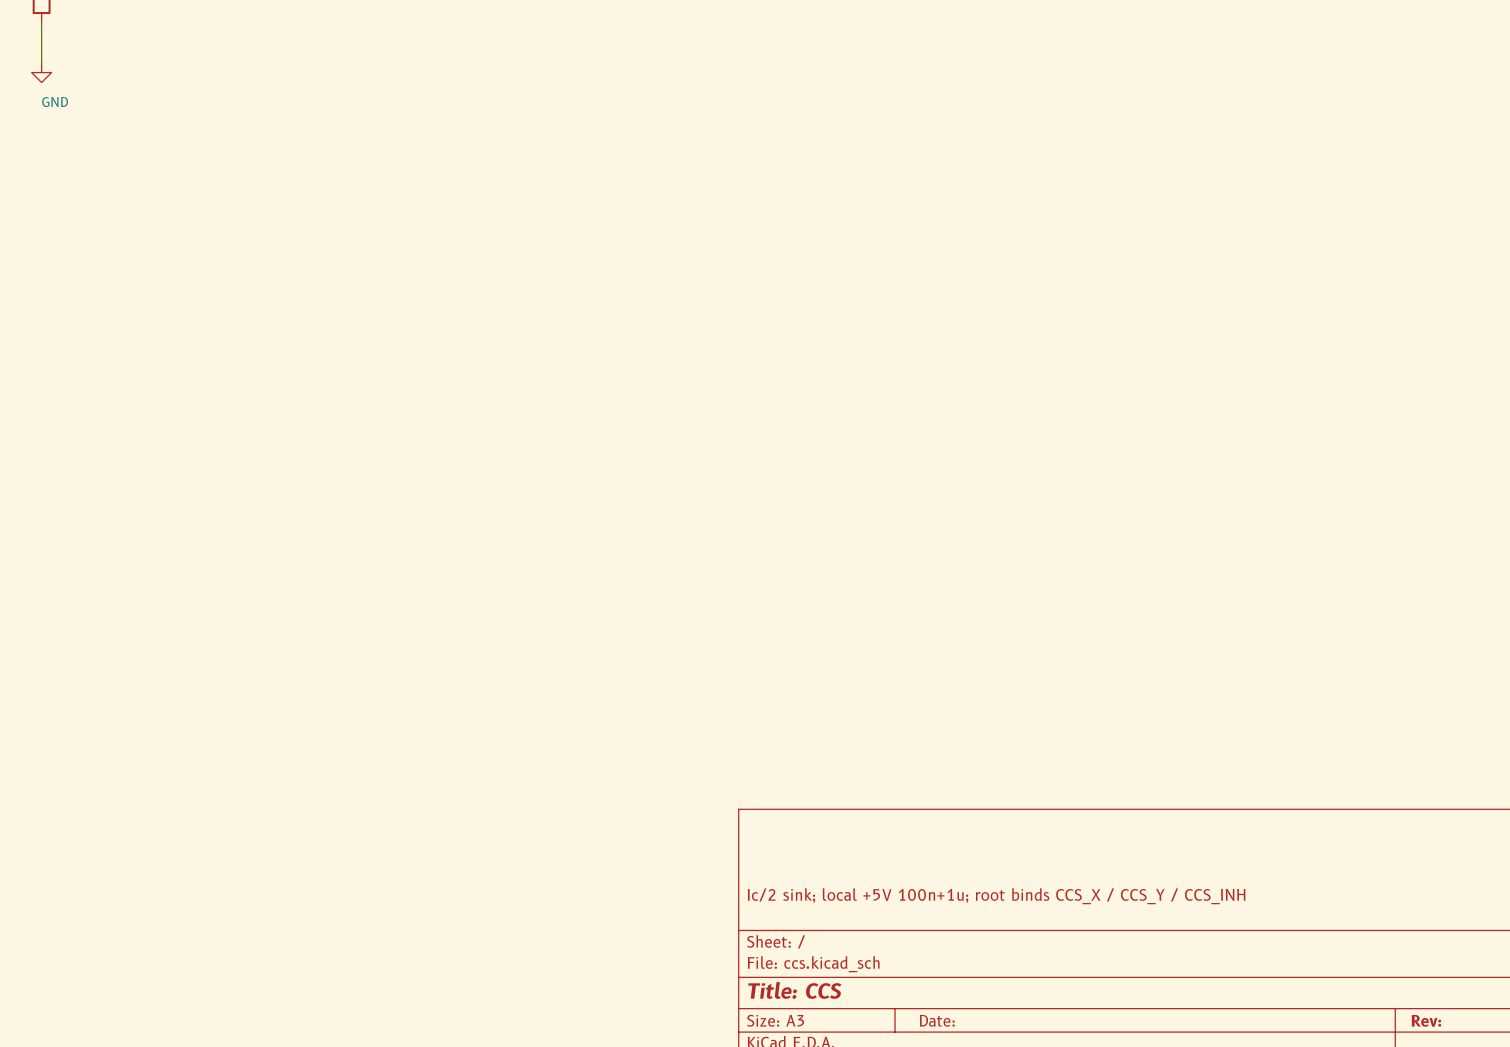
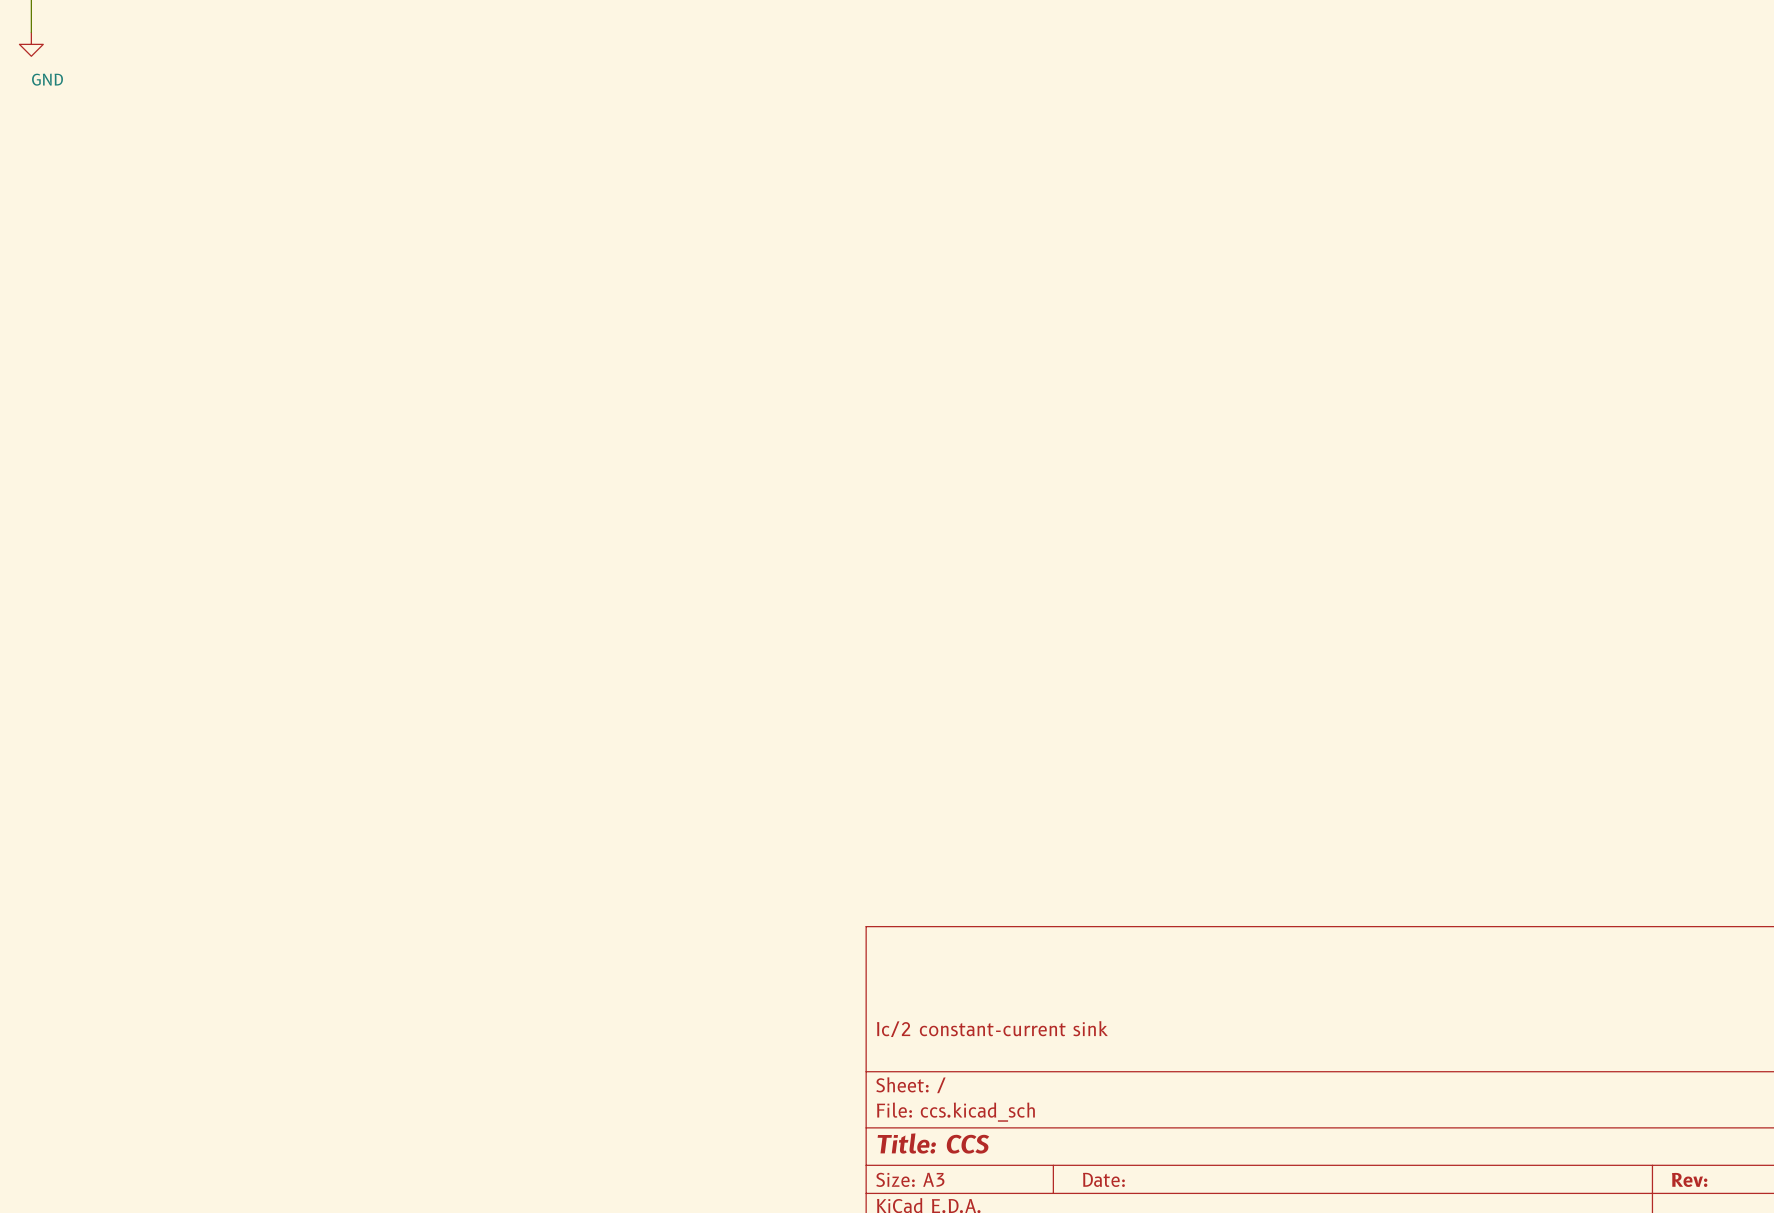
title block: Ic/2 sink; local +5V 100n+1u; root binds CCS_X / CCS_Y / CCS_INH (996, 896) -> Ic/2 constant-current sink (992, 1029)

